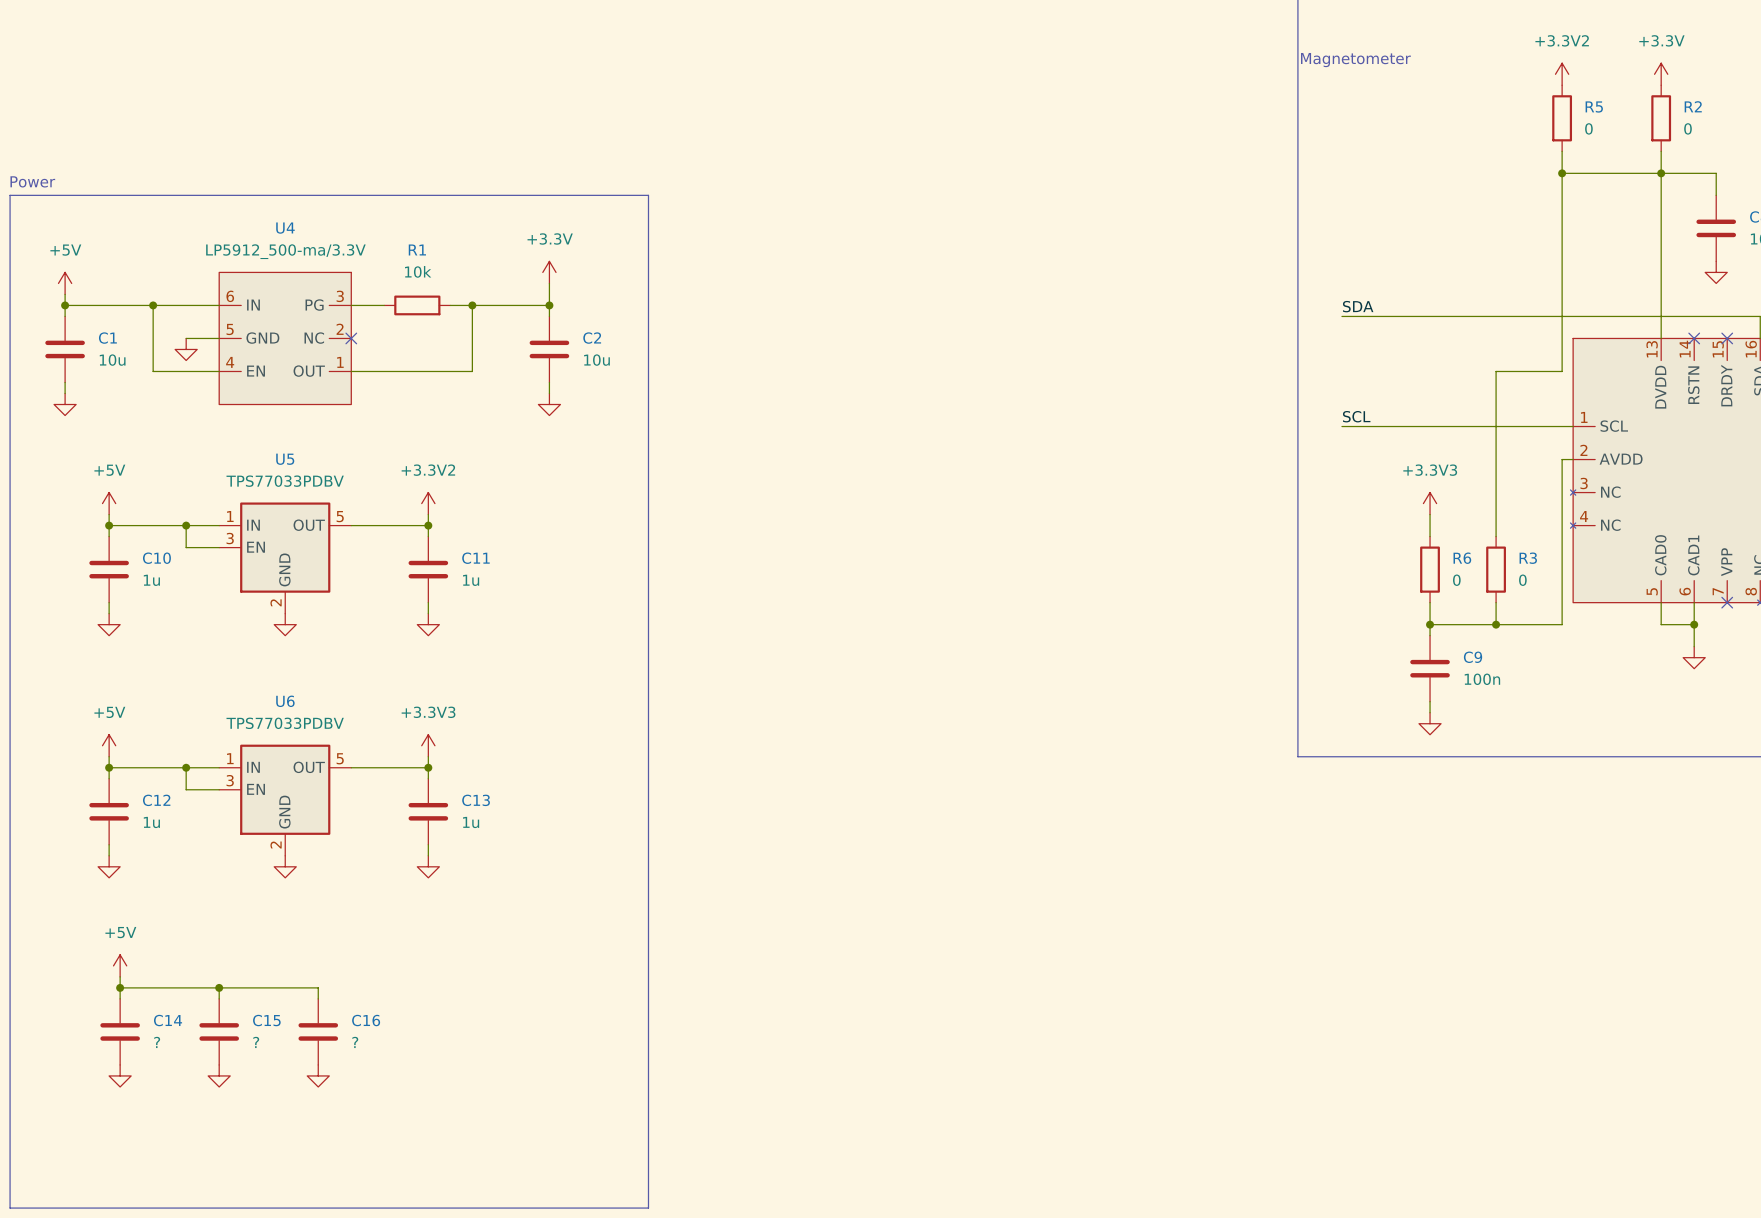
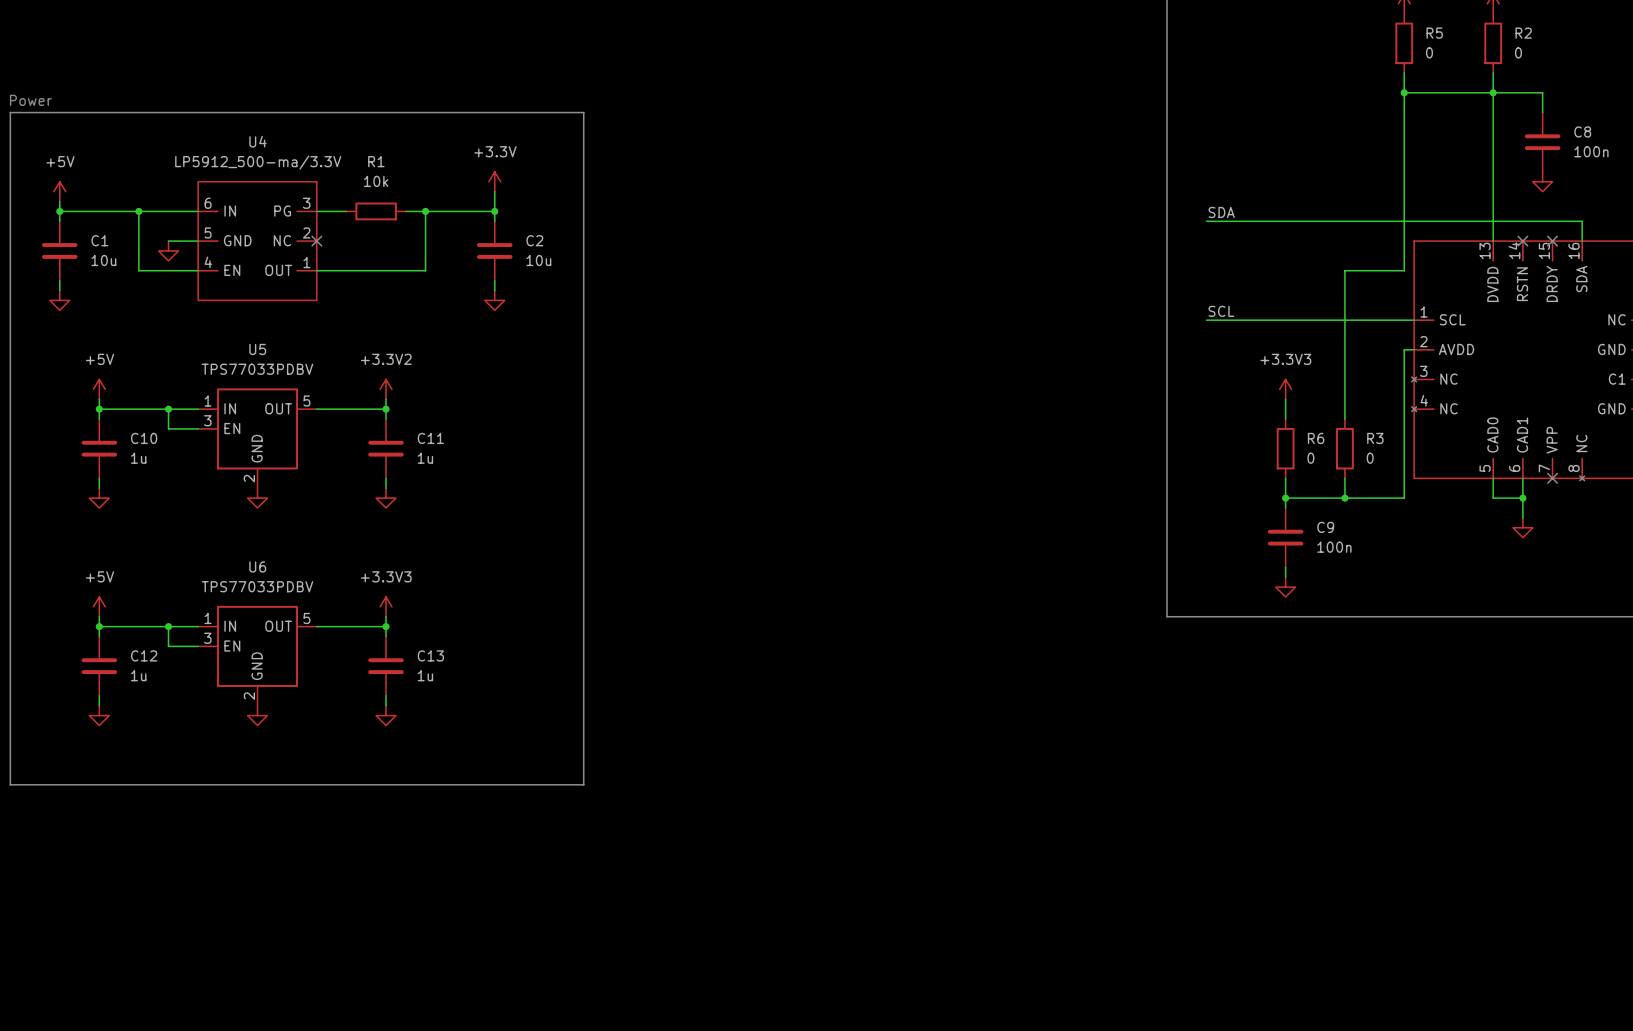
line: (10, 943) (10, 1208) (648, 1208) (648, 943) -> (10, 784) (583, 784)
power symbol: +5V (120, 965) -> none
wire: (120, 976) (120, 998) -> none
wire: (120, 987) (318, 987) (318, 998) -> none
junction: (120, 987) -> none
wire: (219, 987) (219, 998) -> none
junction: (219, 987) -> none
C14: ? (120, 1031) -> none
C15: ? (219, 1031) -> none
C16: ? (318, 1031) -> none
power symbol: (120, 1075) -> none
power symbol: (219, 1075) -> none
power symbol: (318, 1075) -> none

